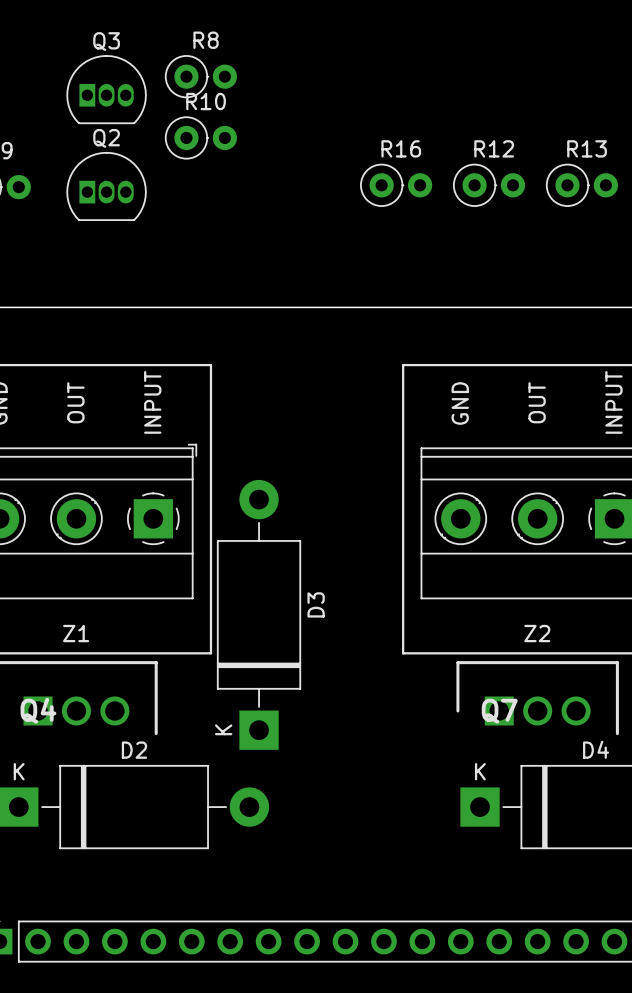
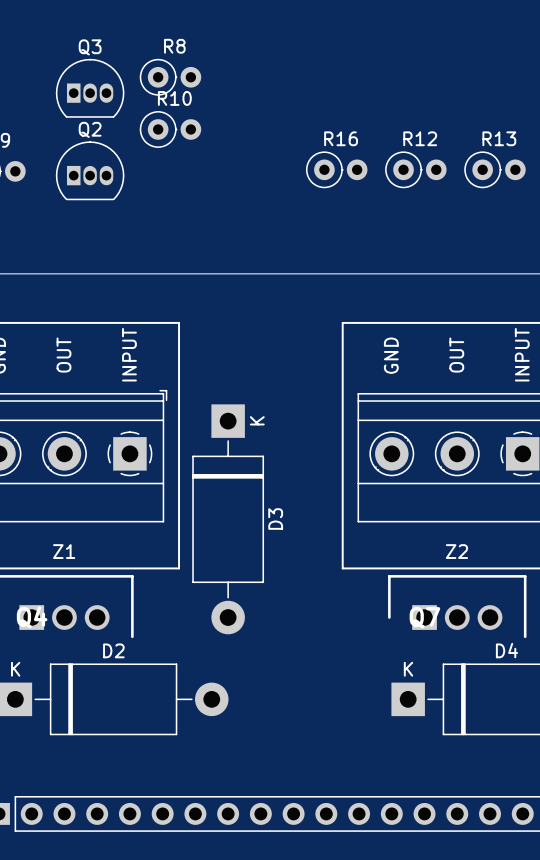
D3 rotation: 0° (259, 614) -> 180° (228, 519)

